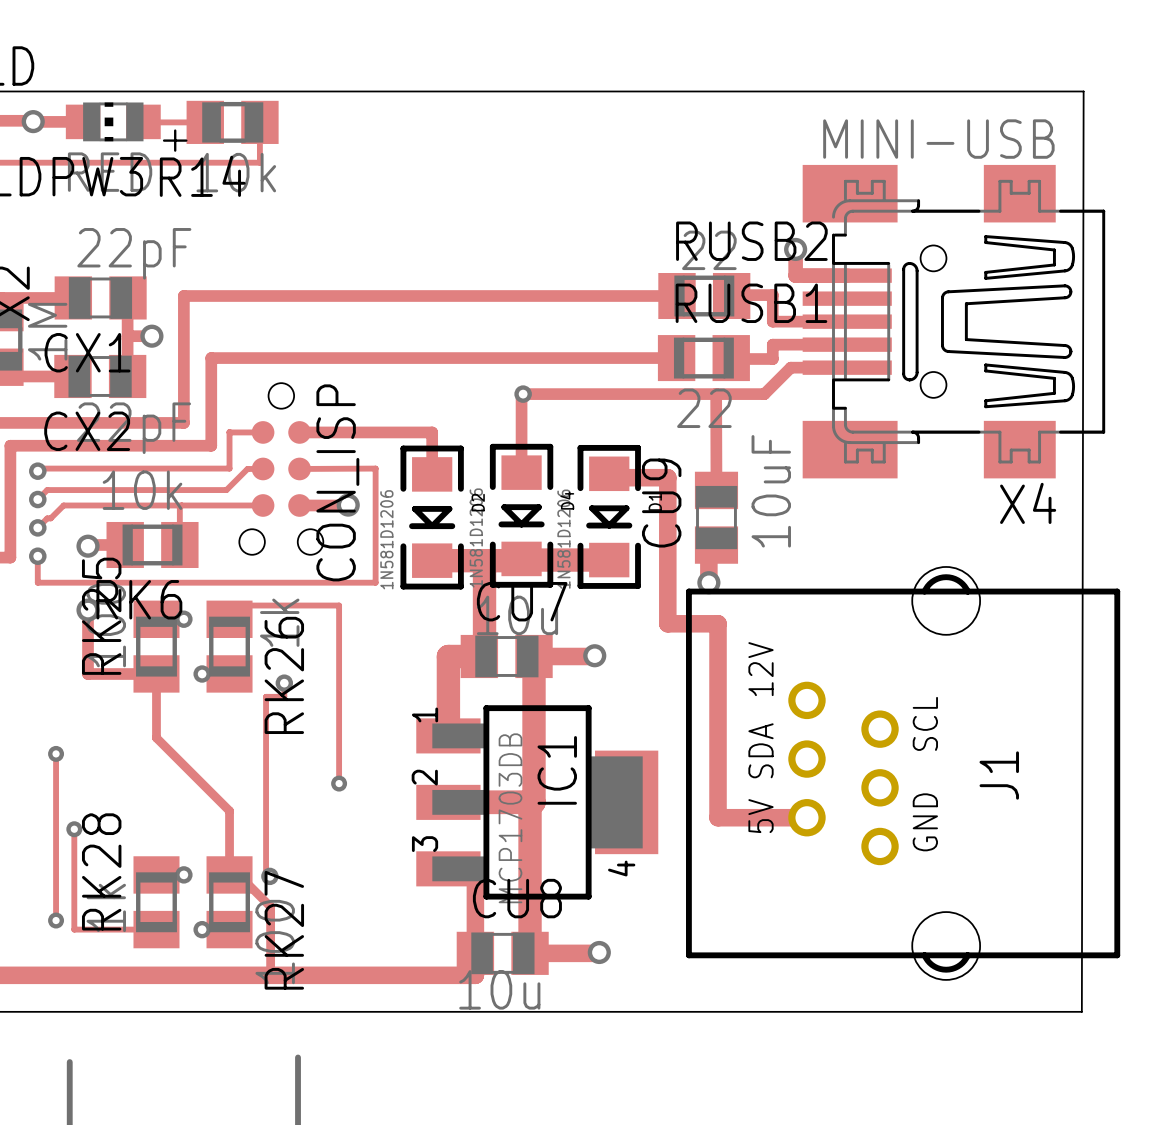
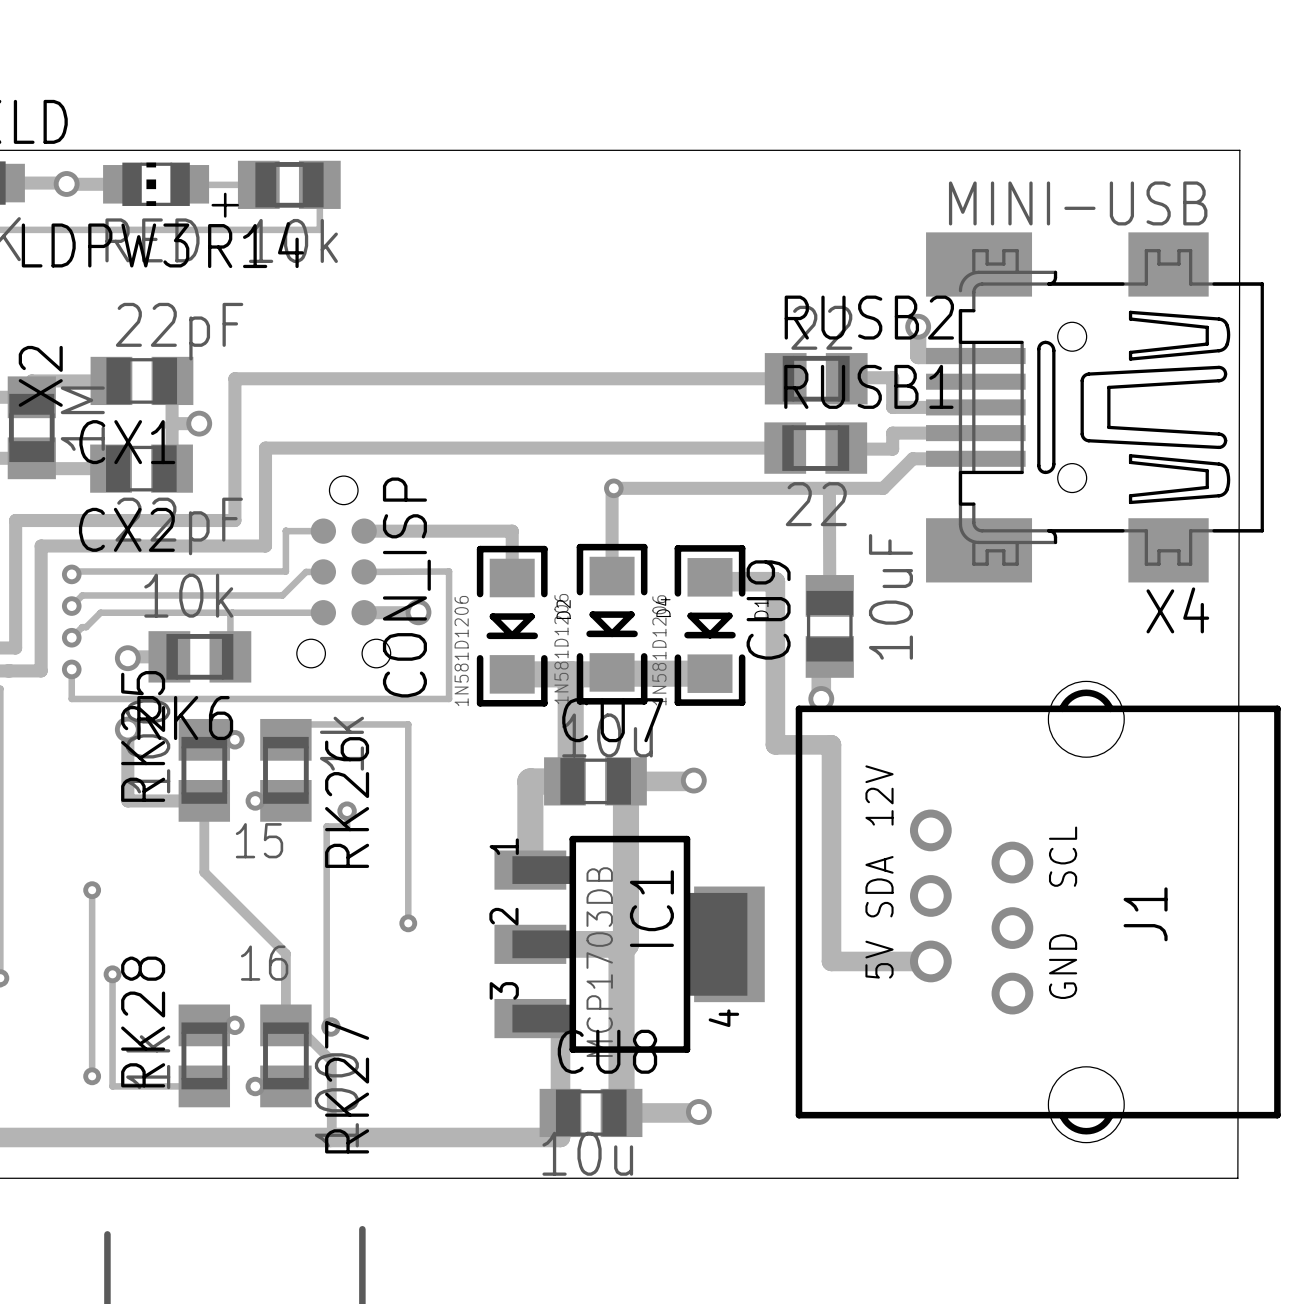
text: none -> 15 (259, 840)
text: none -> 16 (264, 963)

